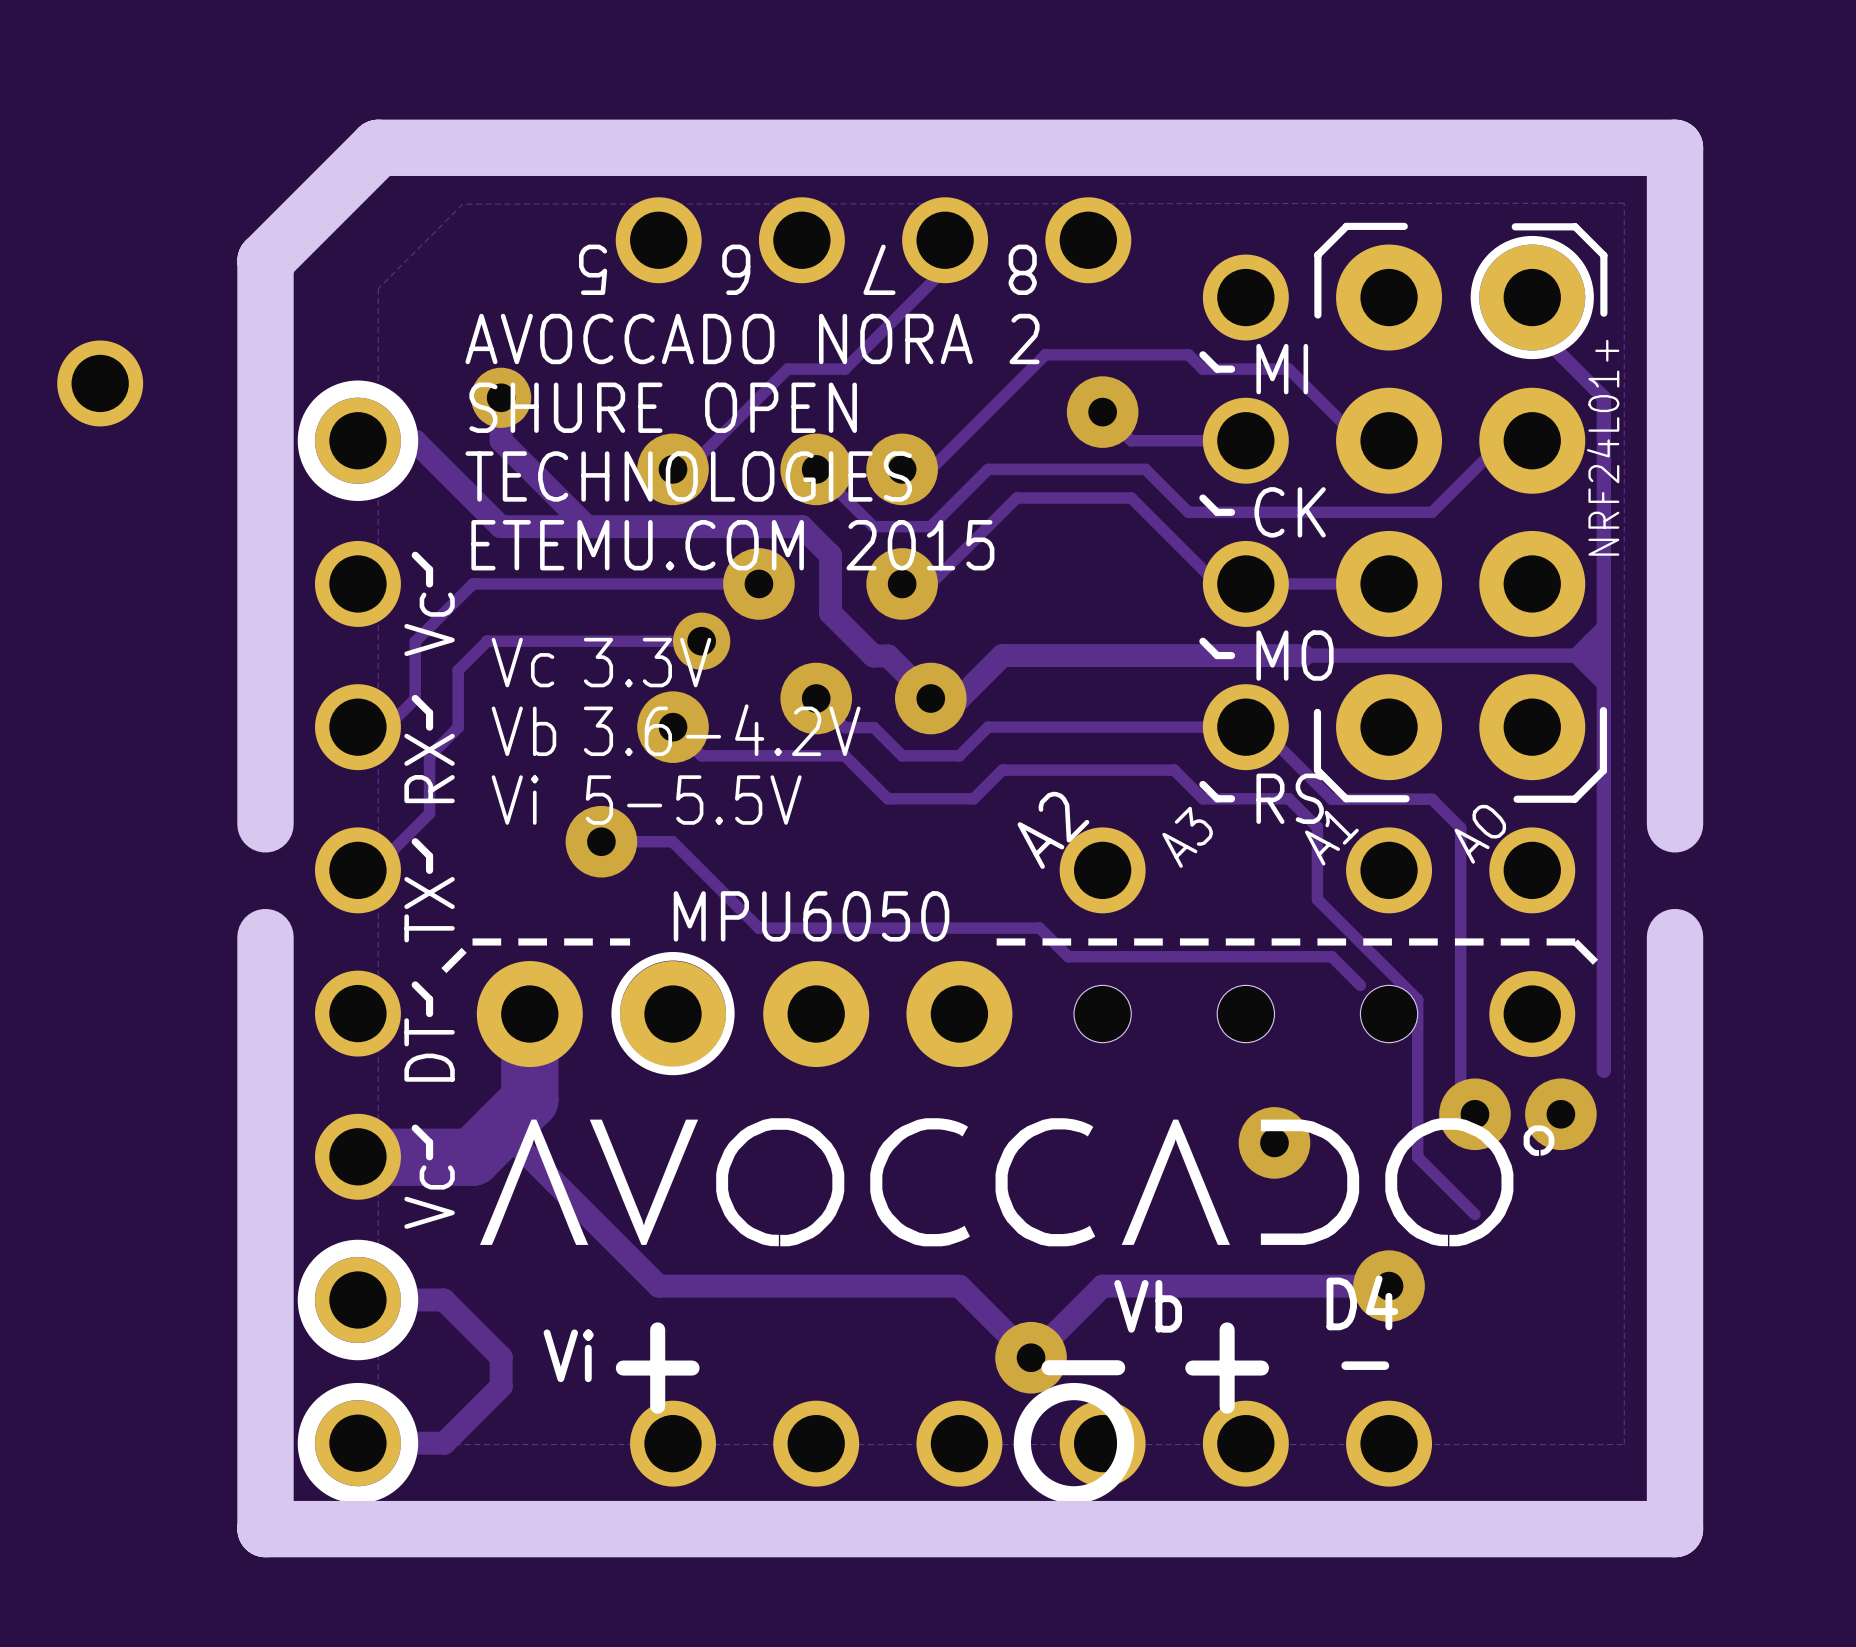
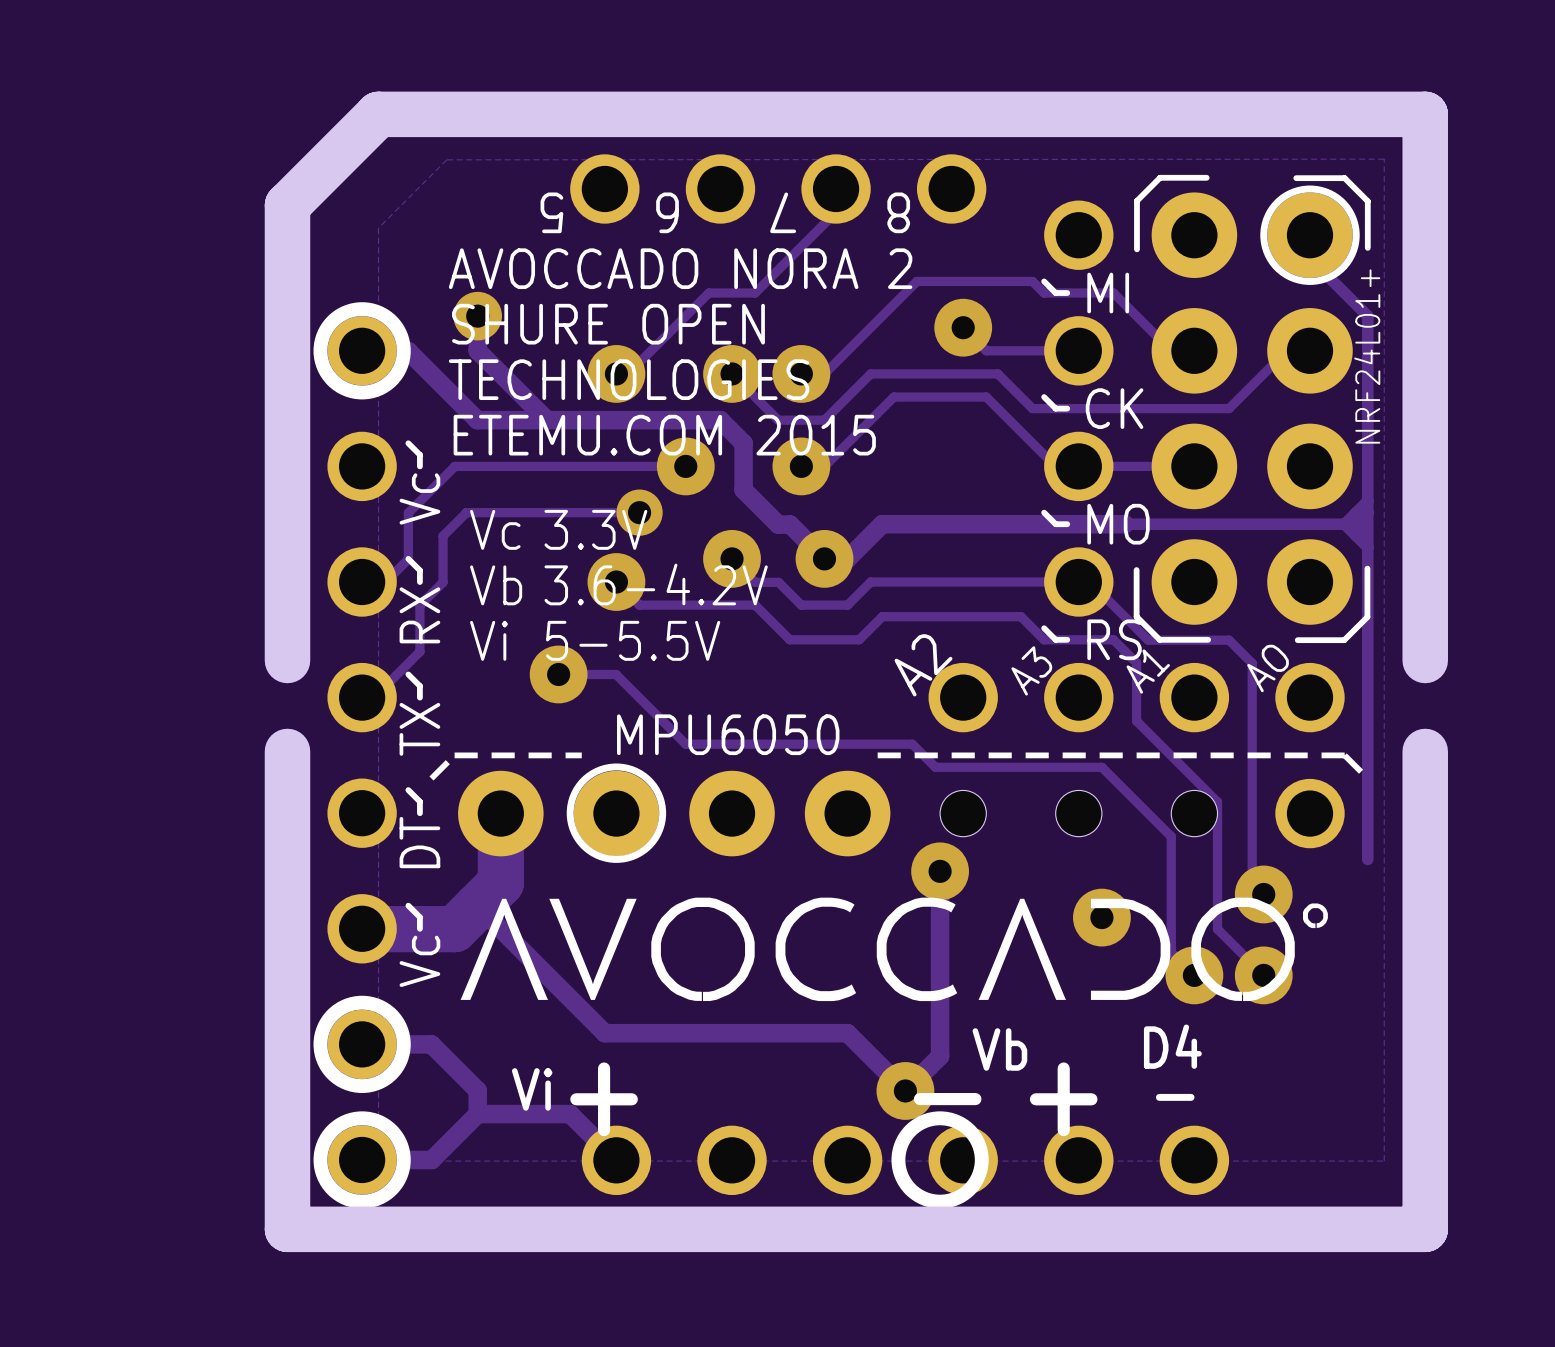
part position: (100, 383) -> (1078, 697)
track: (1274, 956) (1331, 956) (1360, 985) -> (1101, 767) (1171, 836) (1171, 952) (1194, 975)
via: none -> (940, 871)
via: (1560, 1114) -> none
via: none -> (1194, 975)
via: none -> (1263, 975)
track: (1389, 1286) (1102, 1286) (1074, 1314) -> (940, 871) (940, 1056)
via: (1389, 1286) -> none
track: none -> (477, 1114) (570, 1114) (616, 1160)

